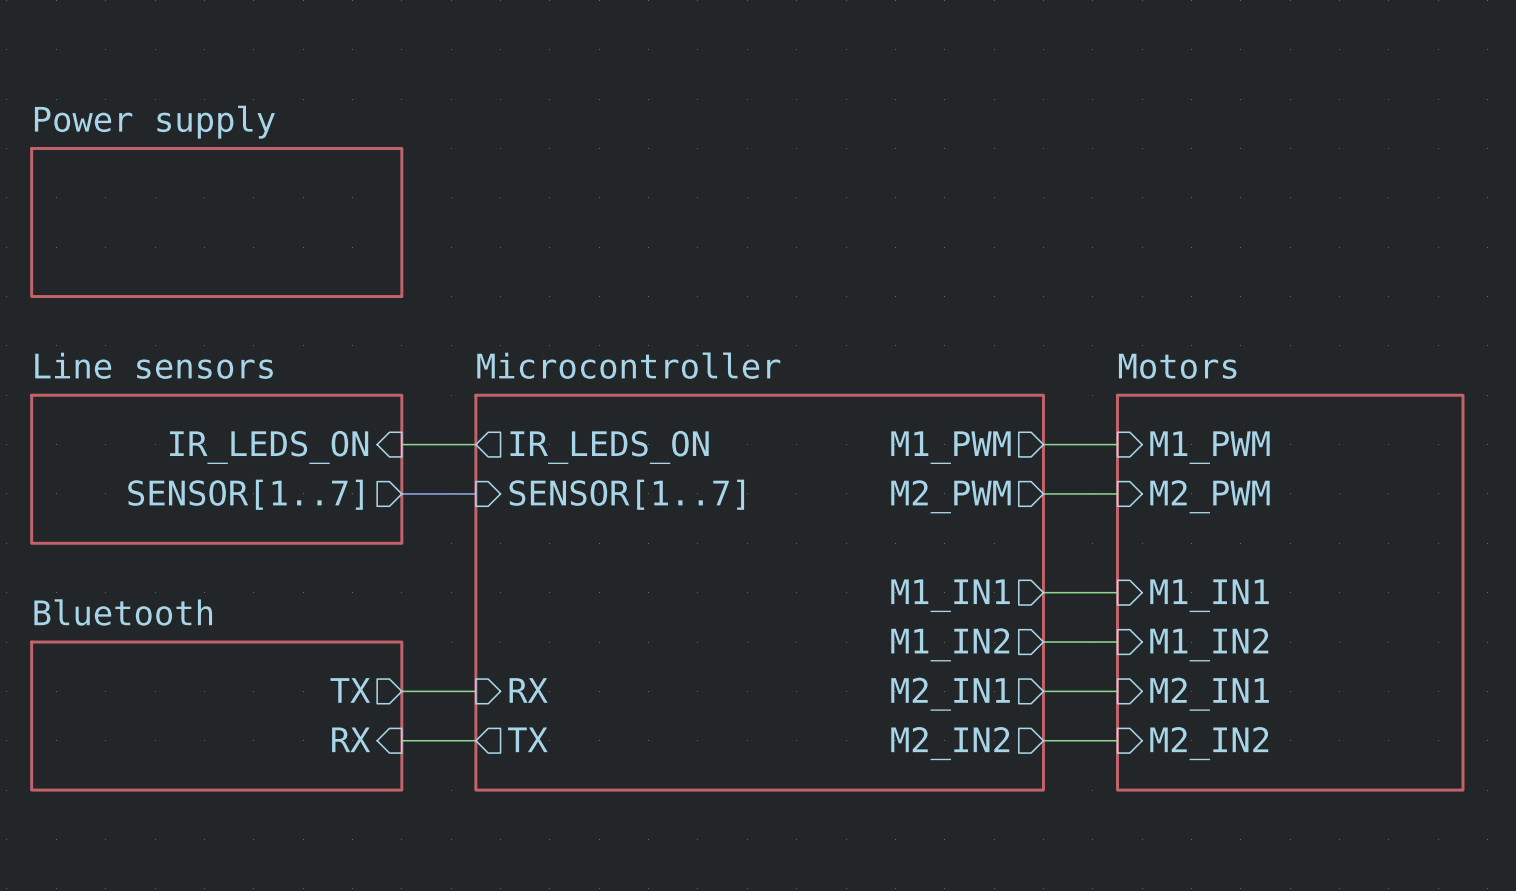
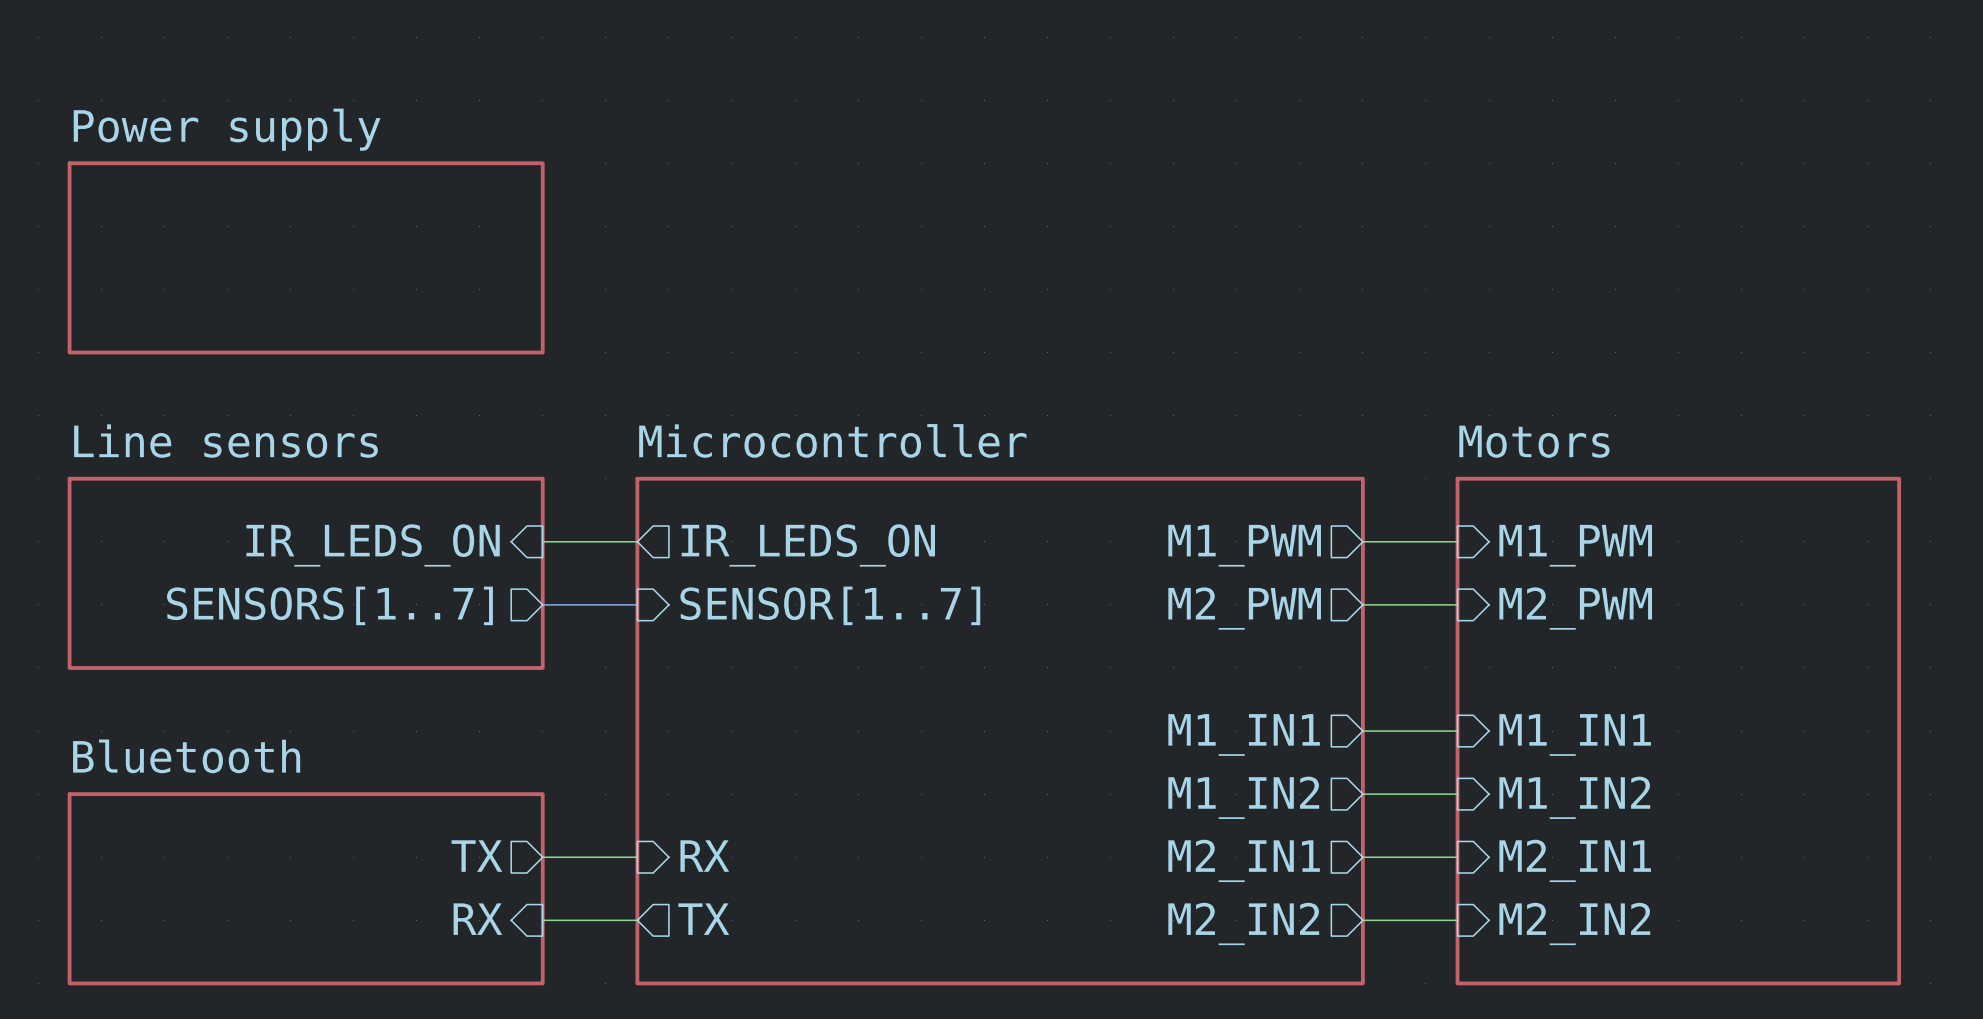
sheet pin: SENSOR[1..7] (245, 494) -> SENSORS[1..7] (329, 605)

